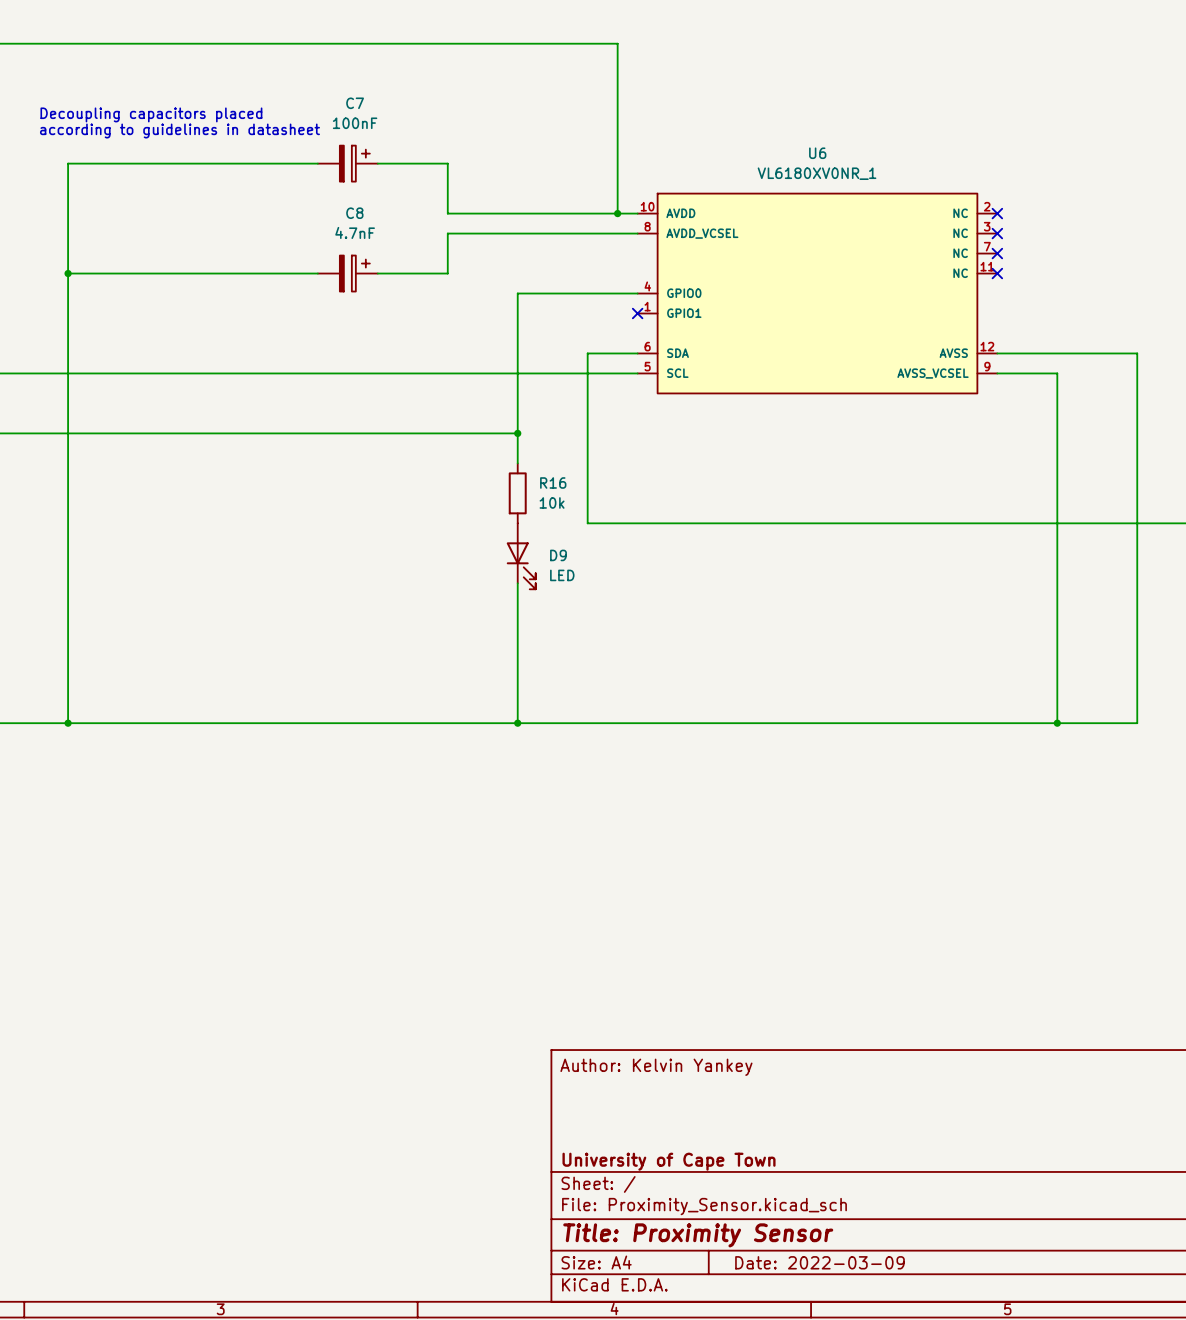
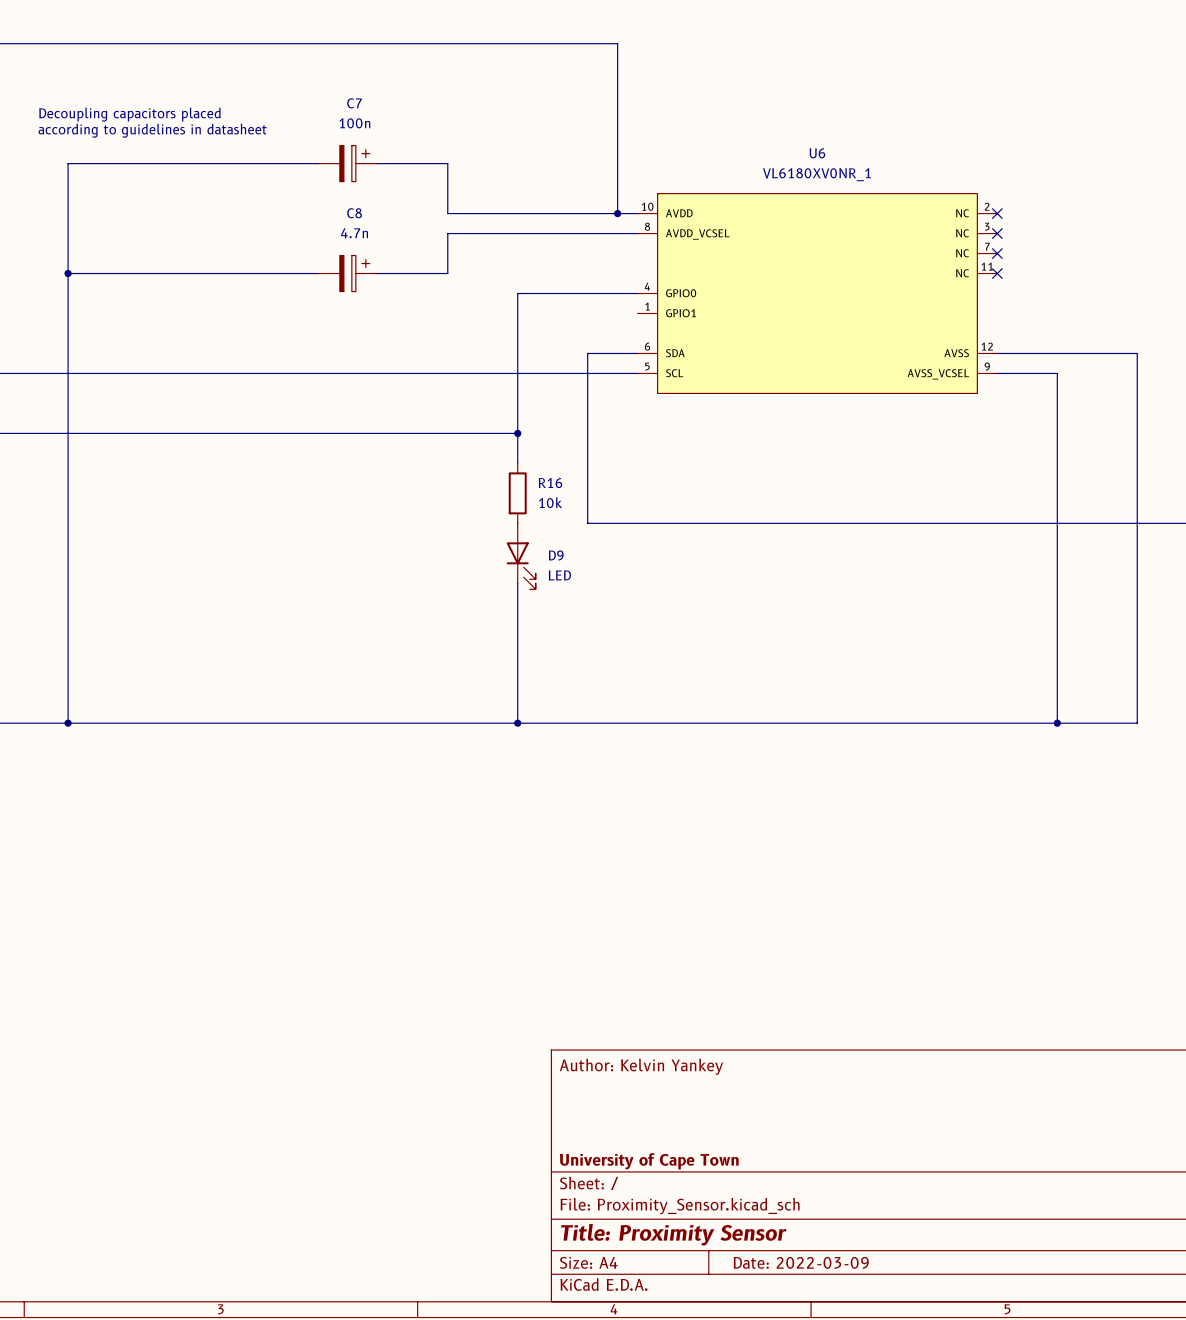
C7 value: 100nF (355, 123) -> 100n (354, 123)
C8 value: 4.7nF (355, 232) -> 4.7n (354, 233)
no-connect mark: (637, 313) -> none

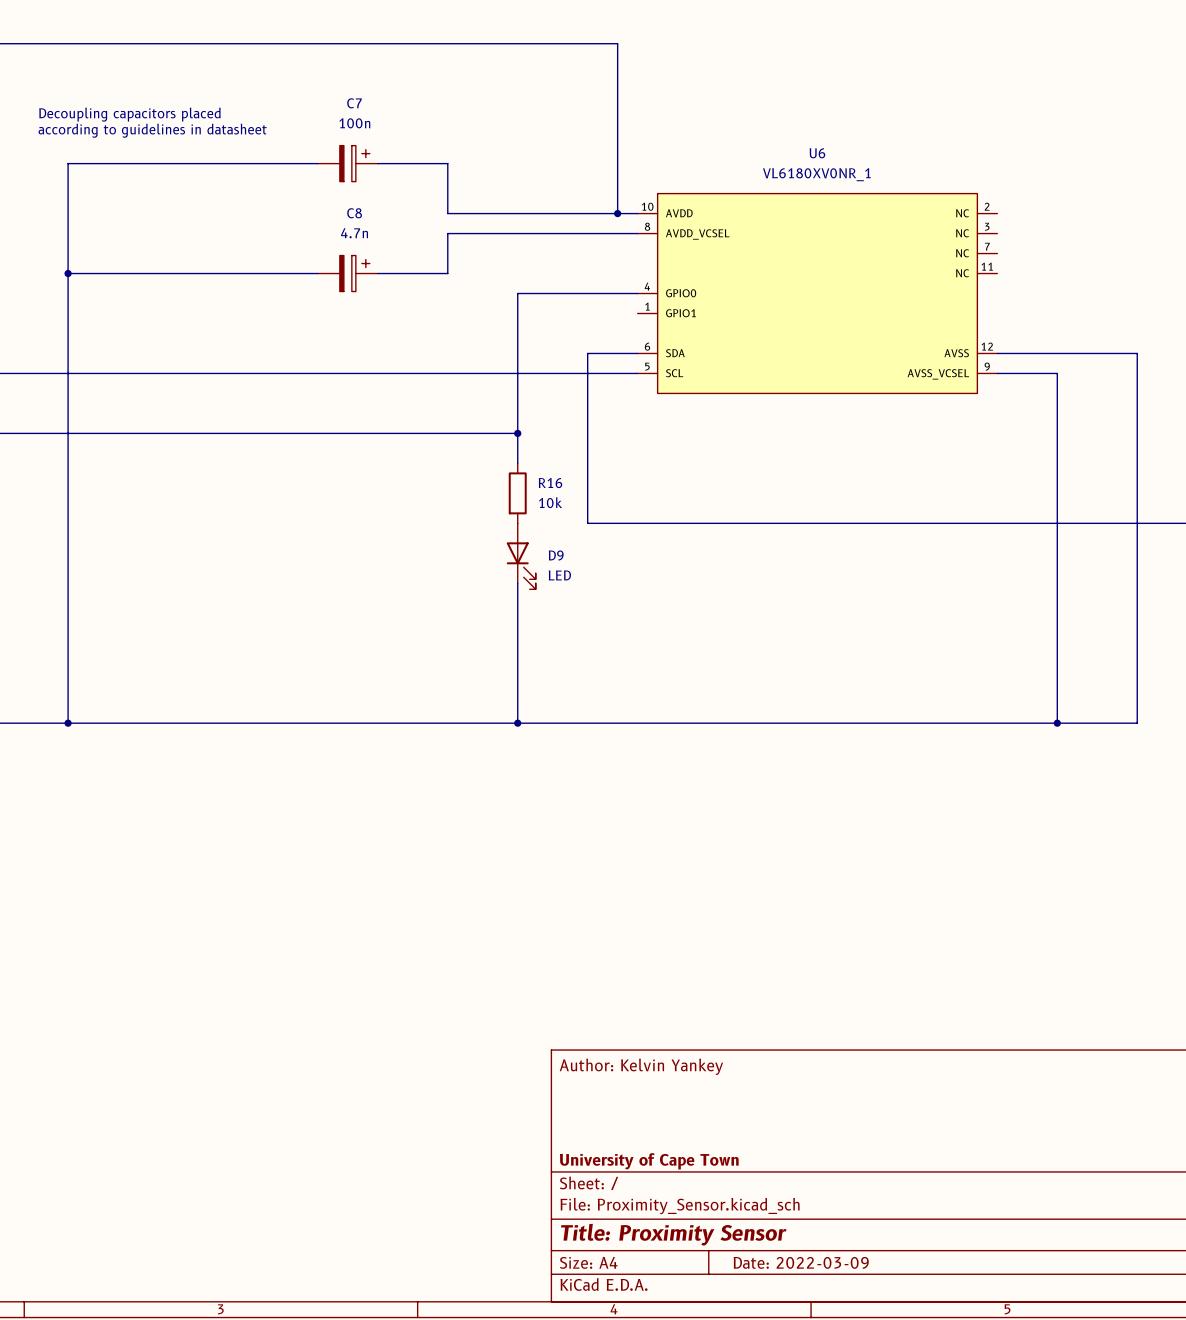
no-connect mark: (997, 213) -> none
no-connect mark: (997, 233) -> none
no-connect mark: (997, 253) -> none
no-connect mark: (997, 273) -> none

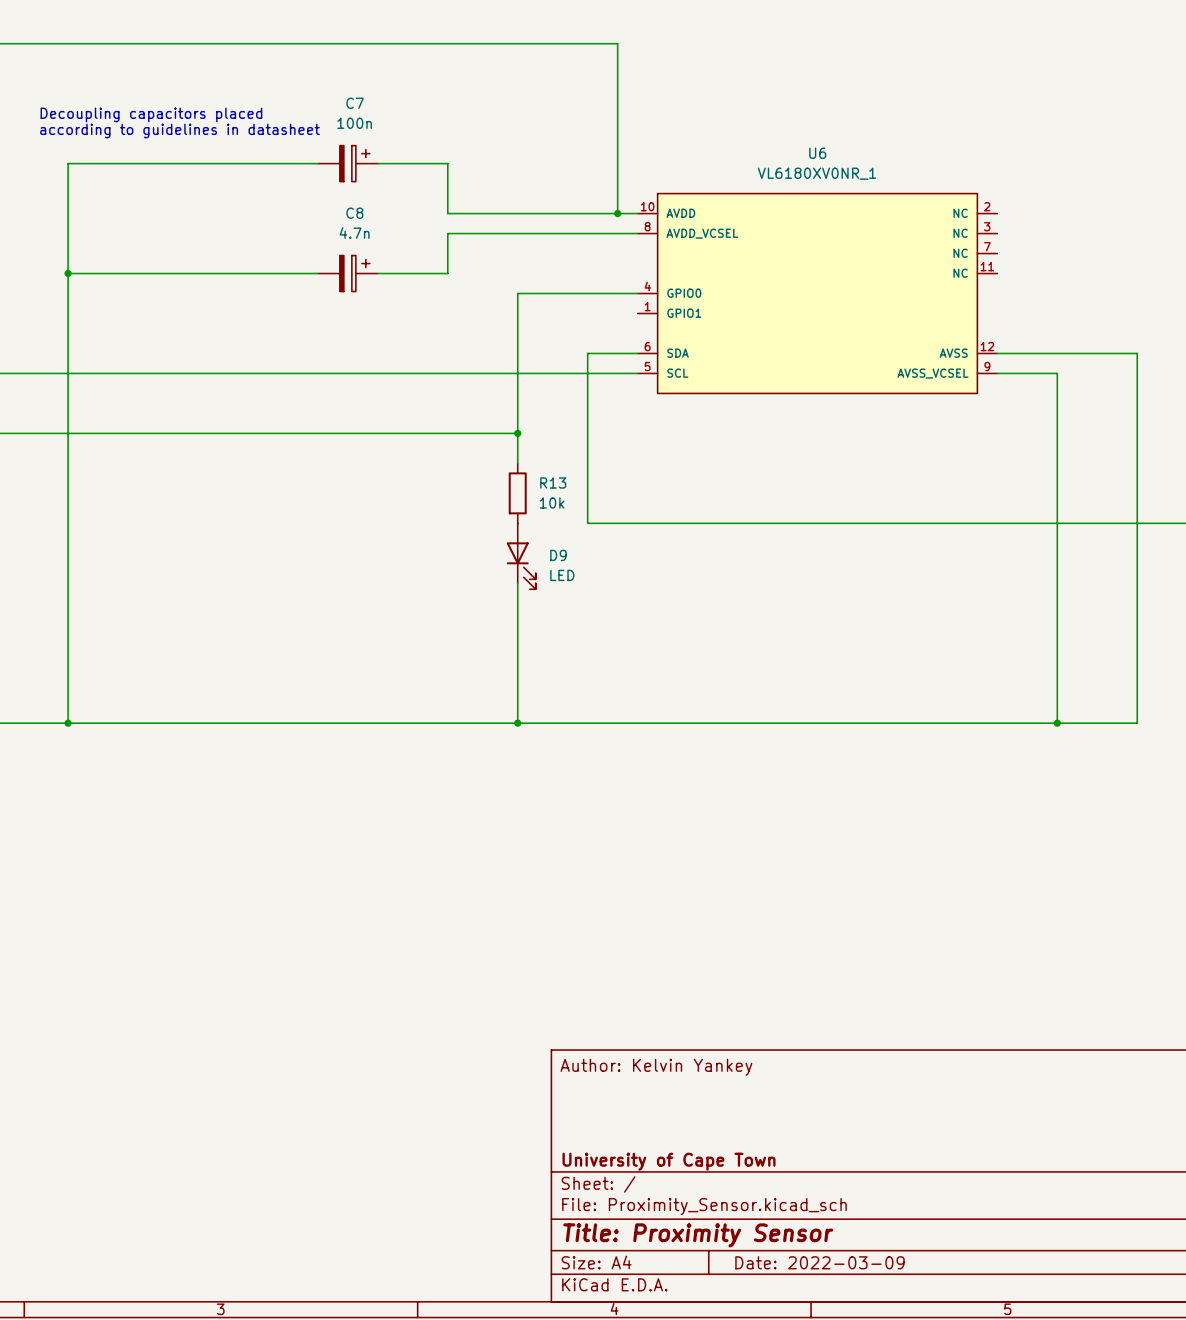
R16 name: R16 (550, 483) -> R13 (553, 482)

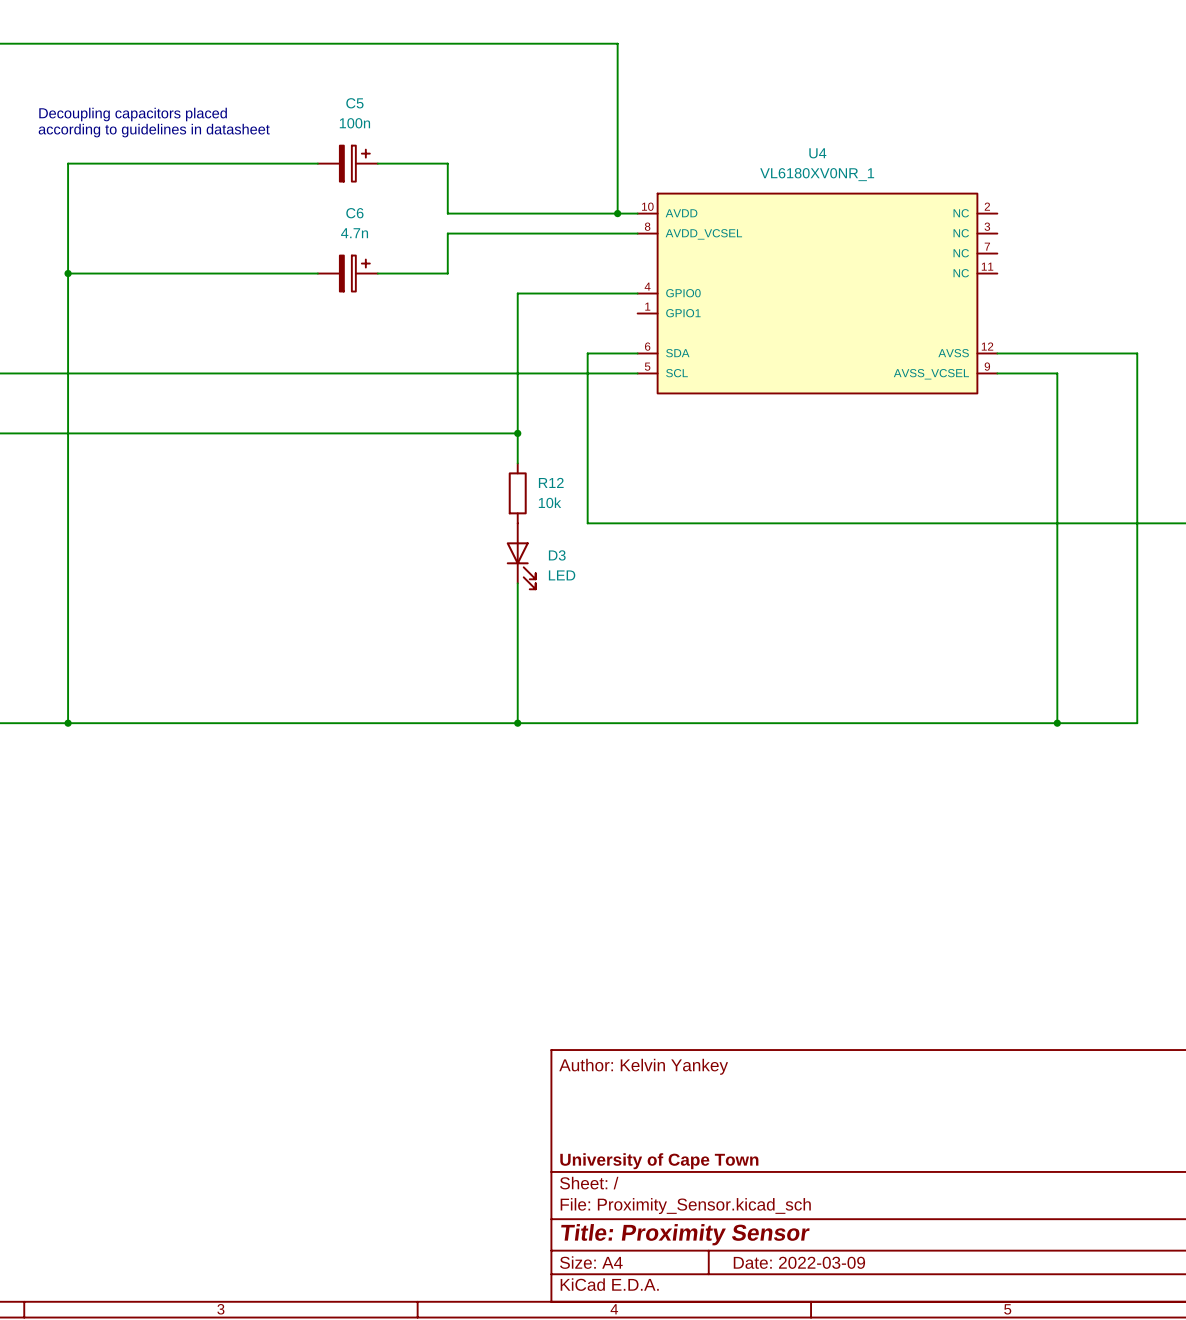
C7 name: C7 (355, 103) -> C5 (354, 103)
U6 name: U6 (817, 153) -> U4 (817, 153)
C8 name: C8 (354, 213) -> C6 (354, 213)
R13 name: R13 (553, 482) -> R12 (551, 482)
D9 name: D9 (558, 555) -> D3 (557, 555)

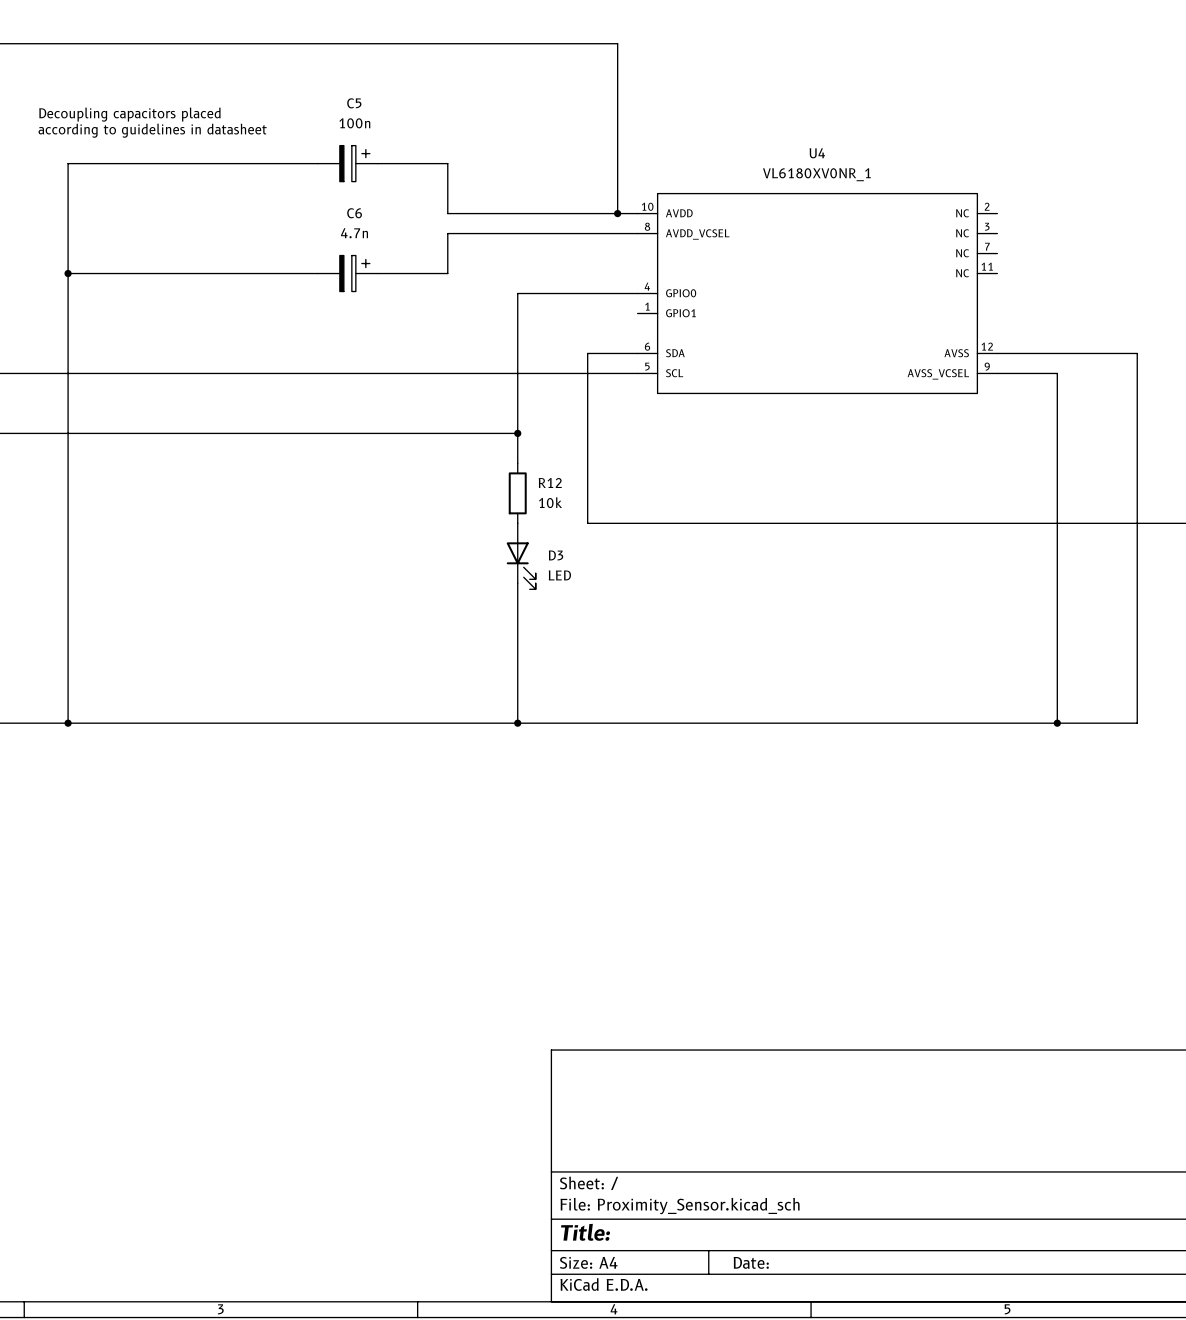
title block: Author: Kelvin Yankey (643, 1066) -> none
title block: University of Cape Town (659, 1161) -> none
title block: Title: Proximity Sensor (685, 1234) -> Title: (585, 1232)
title block: Date: 2022-03-09 (799, 1262) -> Date: (751, 1262)

